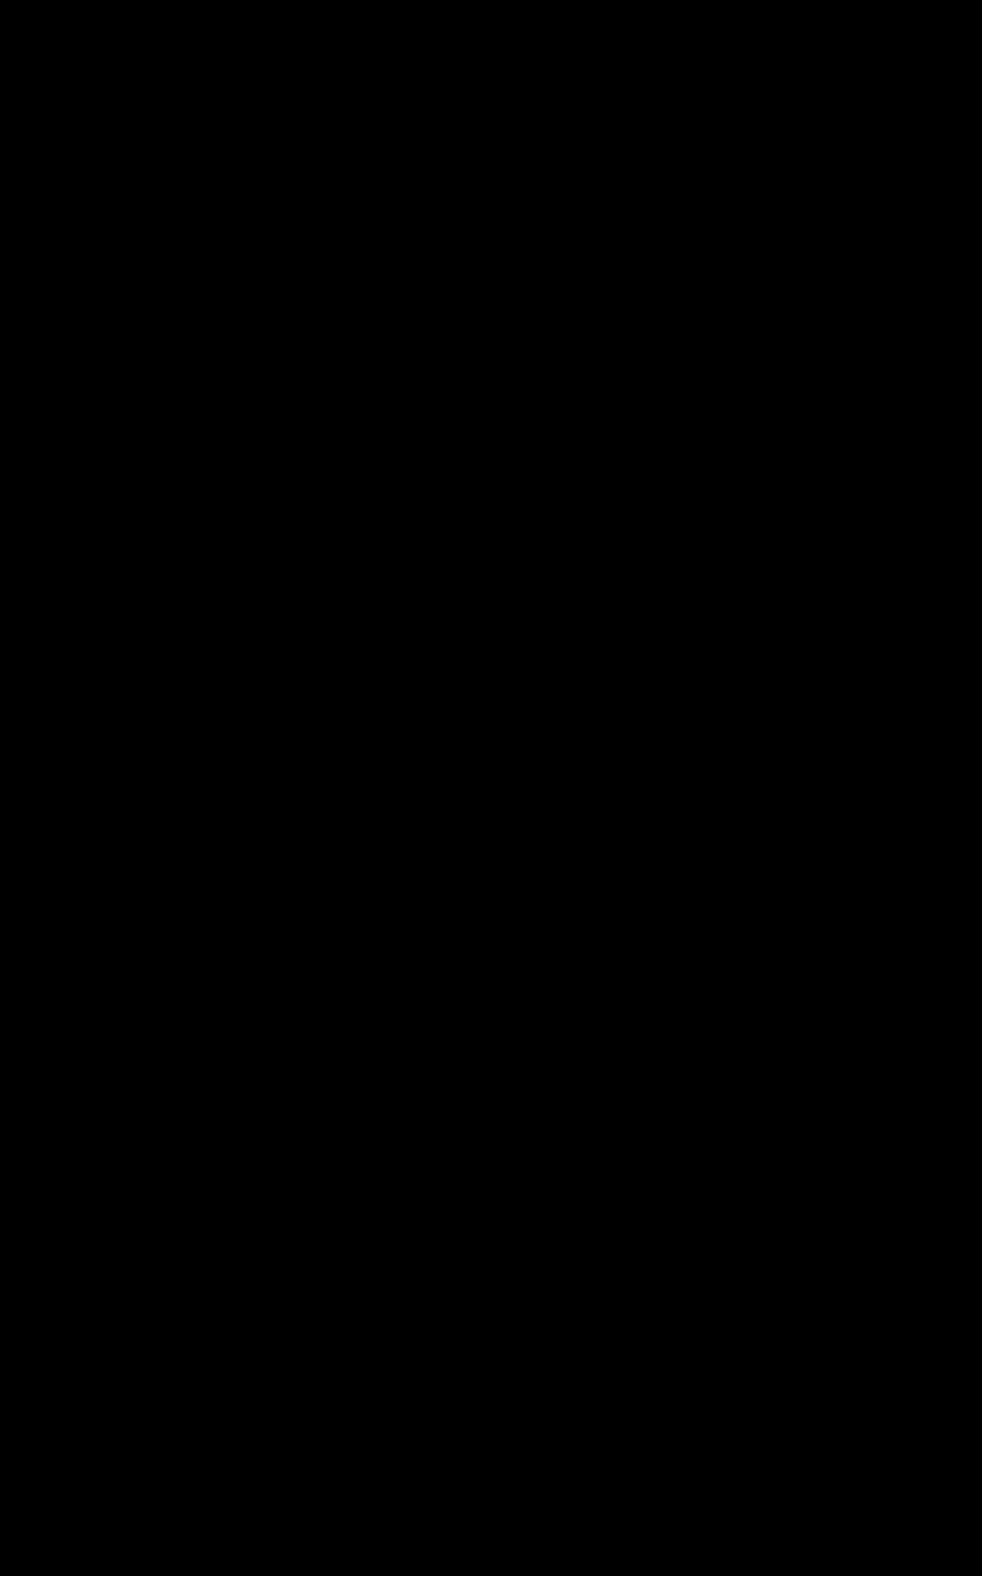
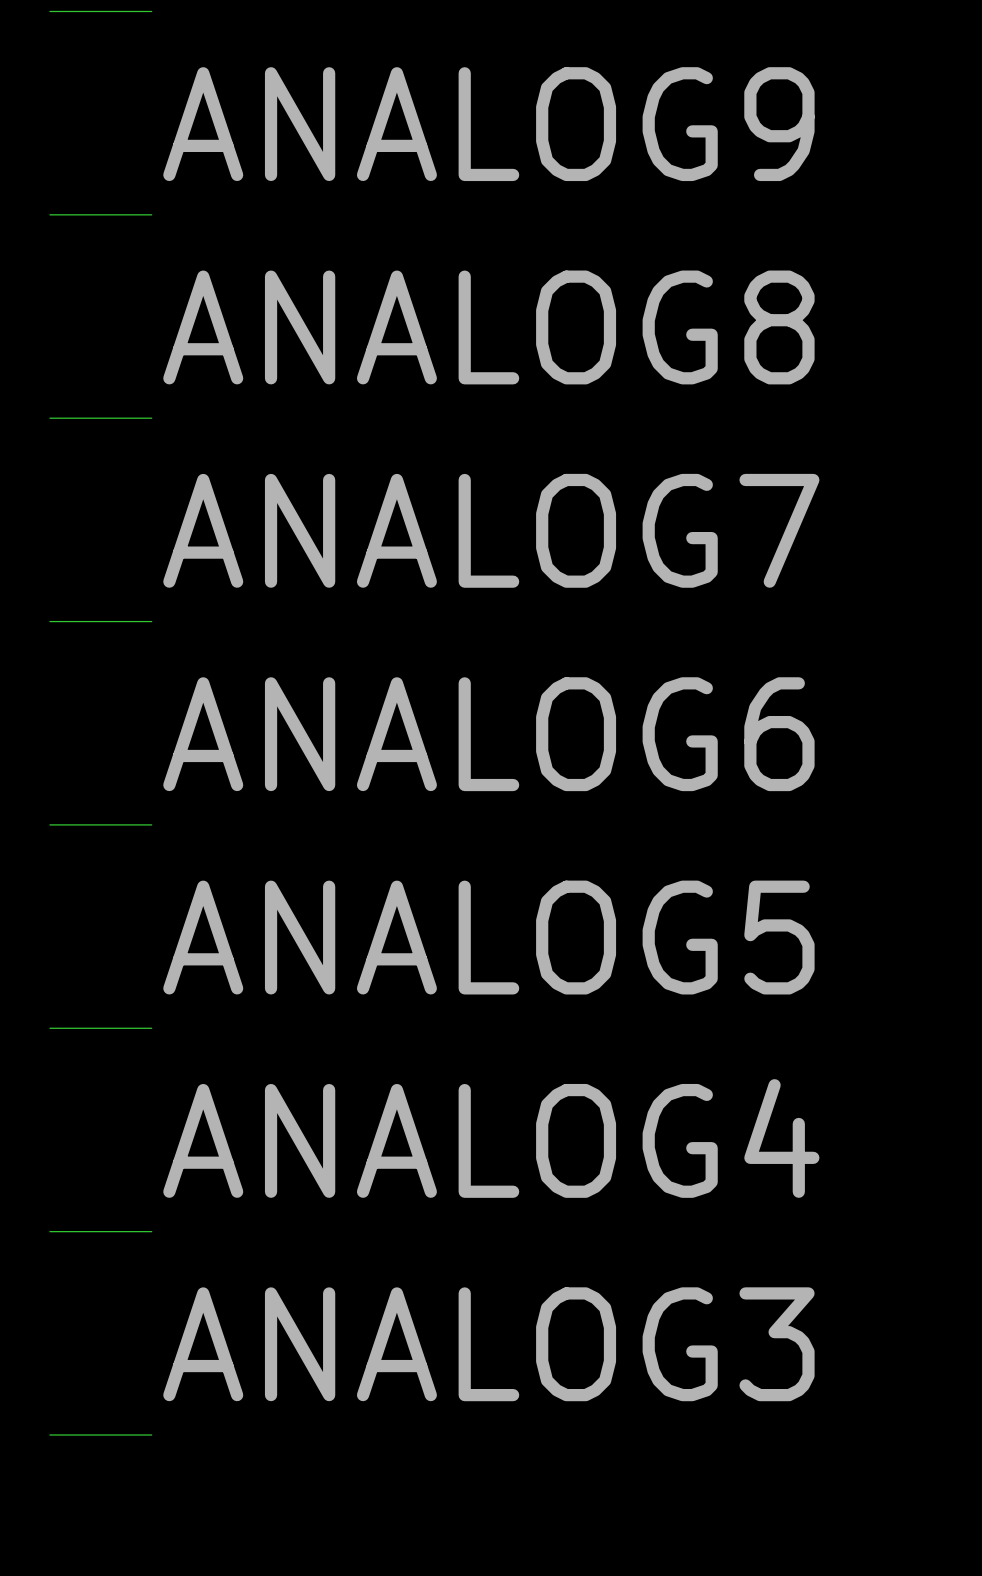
wire: none -> (49, 11) (151, 11)
label: none -> ANALOG9 (488, 124)
wire: none -> (49, 214) (151, 214)
label: none -> ANALOG8 (488, 327)
wire: none -> (49, 418) (151, 418)
label: none -> ANALOG7 (491, 530)
wire: none -> (49, 621) (151, 621)
label: none -> ANALOG6 (488, 734)
wire: none -> (49, 824) (151, 824)
label: none -> ANALOG5 (488, 937)
wire: none -> (49, 1028) (151, 1028)
label: none -> ANALOG4 (491, 1138)
wire: none -> (49, 1231) (151, 1231)
label: none -> ANALOG3 (488, 1344)
wire: none -> (49, 1435) (151, 1435)

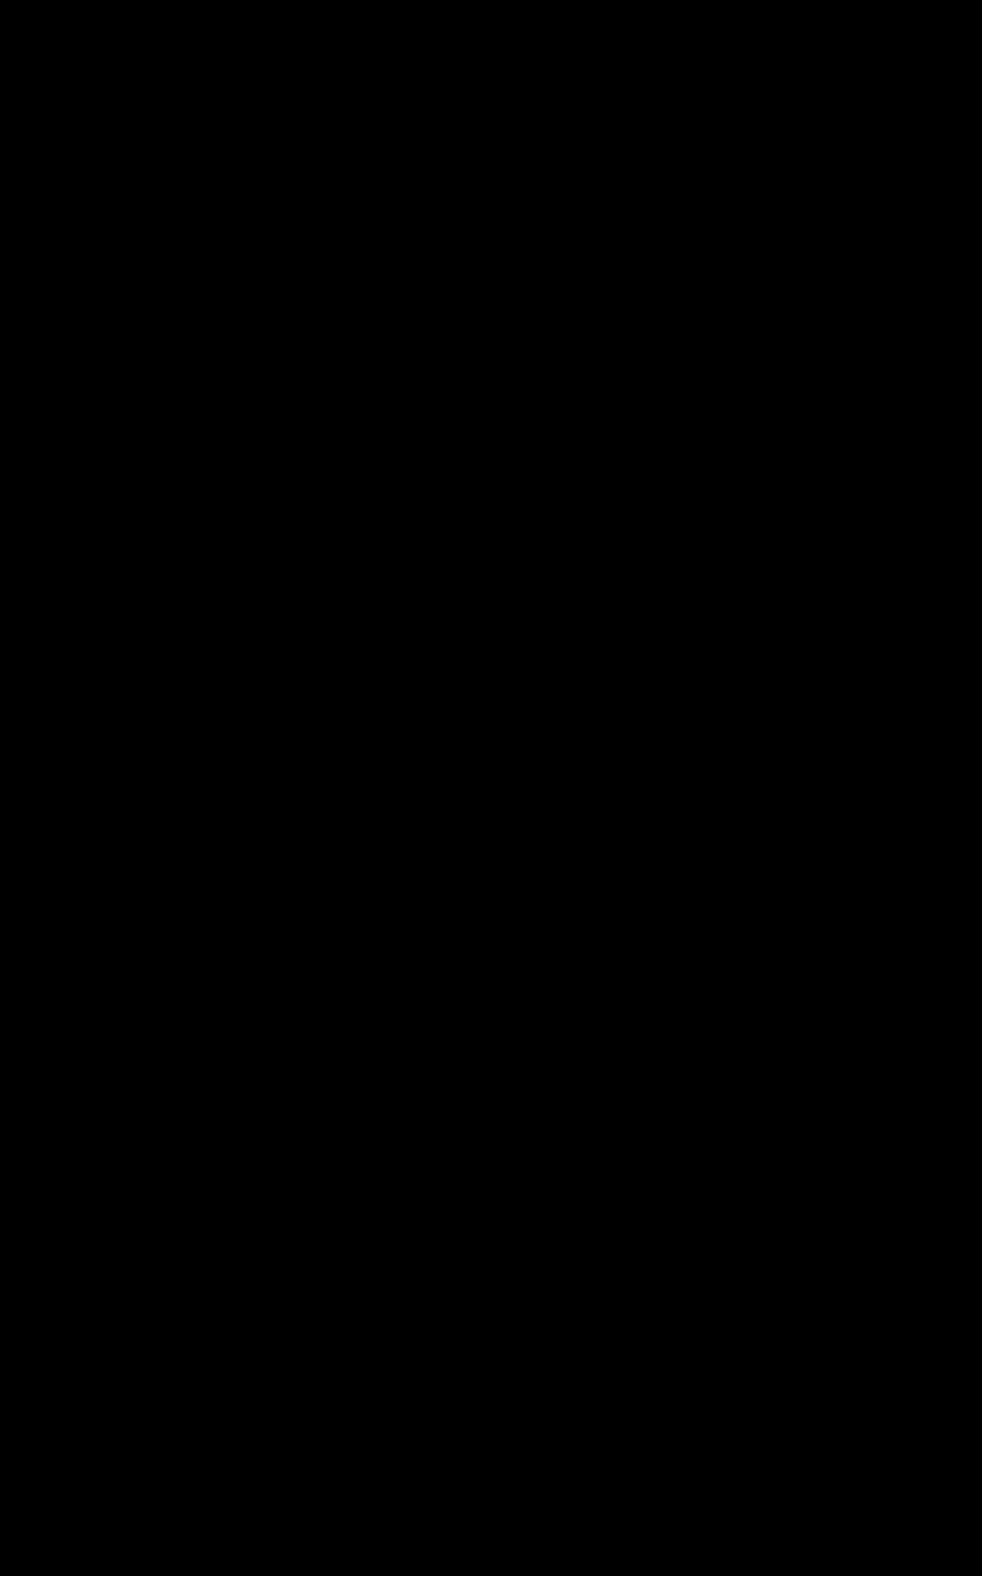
wire: (49, 11) (151, 11) -> none
label: ANALOG9 (488, 124) -> none
wire: (49, 214) (151, 214) -> none
label: ANALOG8 (488, 327) -> none
wire: (49, 418) (151, 418) -> none
label: ANALOG7 (491, 530) -> none
wire: (49, 621) (151, 621) -> none
label: ANALOG6 (488, 734) -> none
wire: (49, 824) (151, 824) -> none
label: ANALOG5 (488, 937) -> none
wire: (49, 1028) (151, 1028) -> none
label: ANALOG4 (491, 1138) -> none
wire: (49, 1231) (151, 1231) -> none
label: ANALOG3 (488, 1344) -> none
wire: (49, 1435) (151, 1435) -> none

